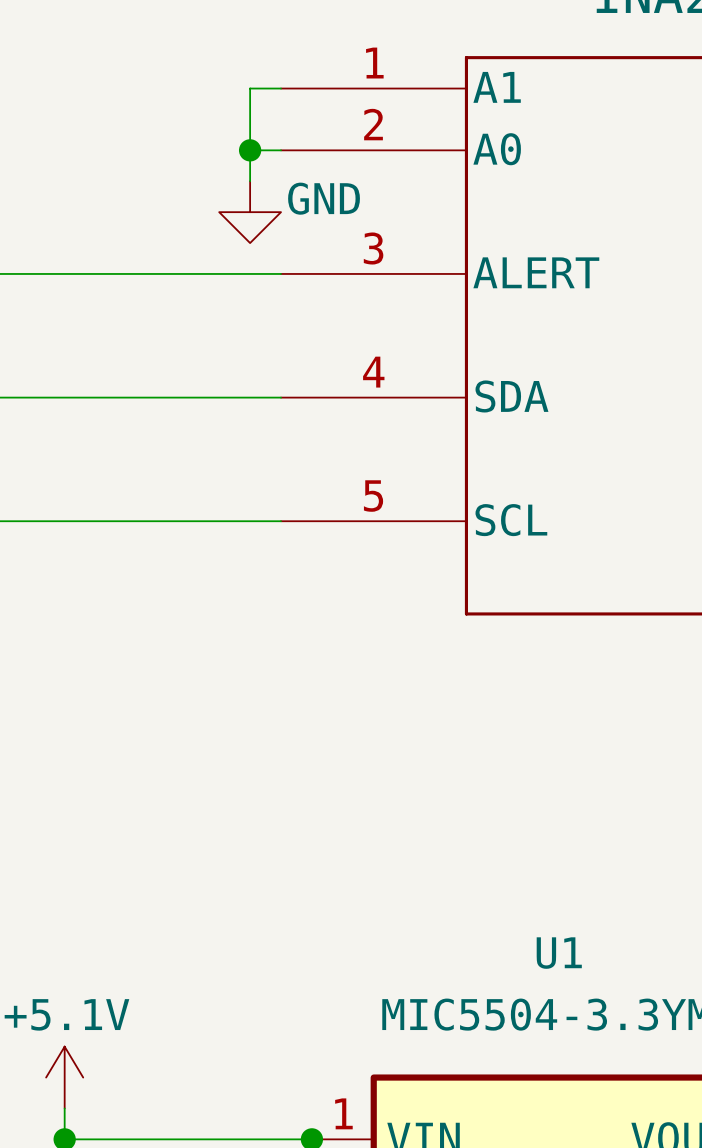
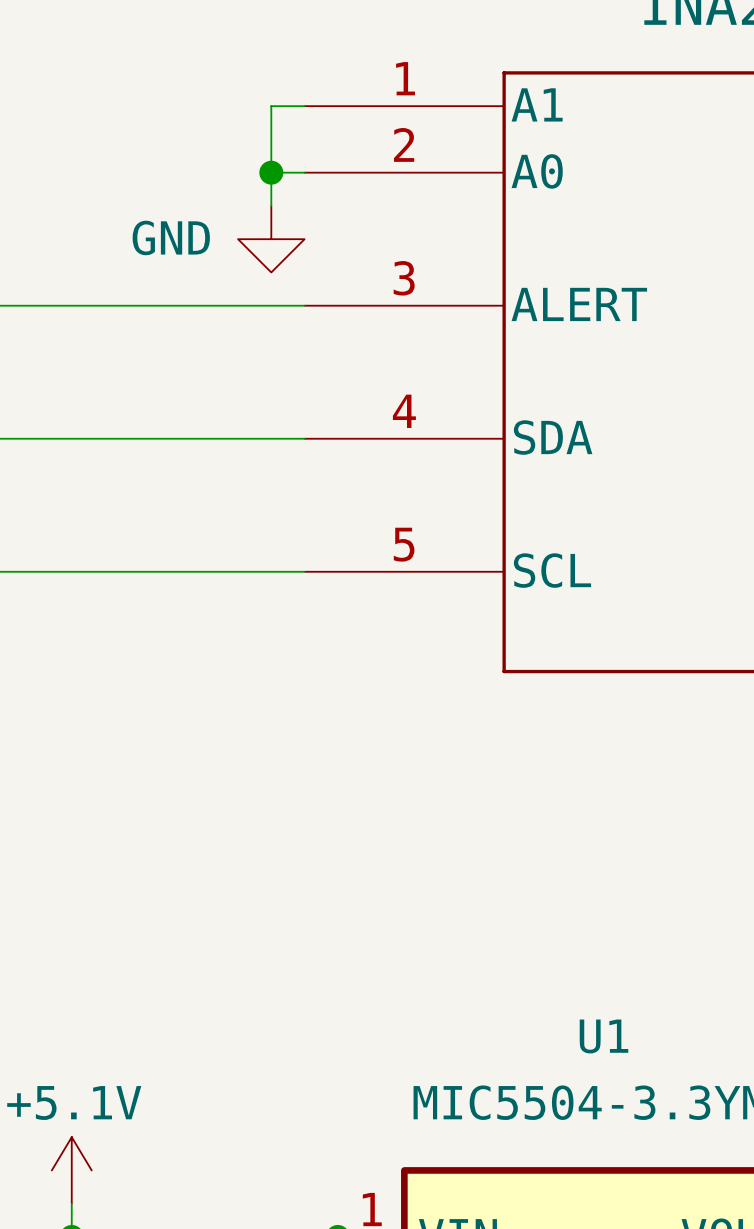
power symbol text position: GND (324, 198) -> GND (171, 237)

